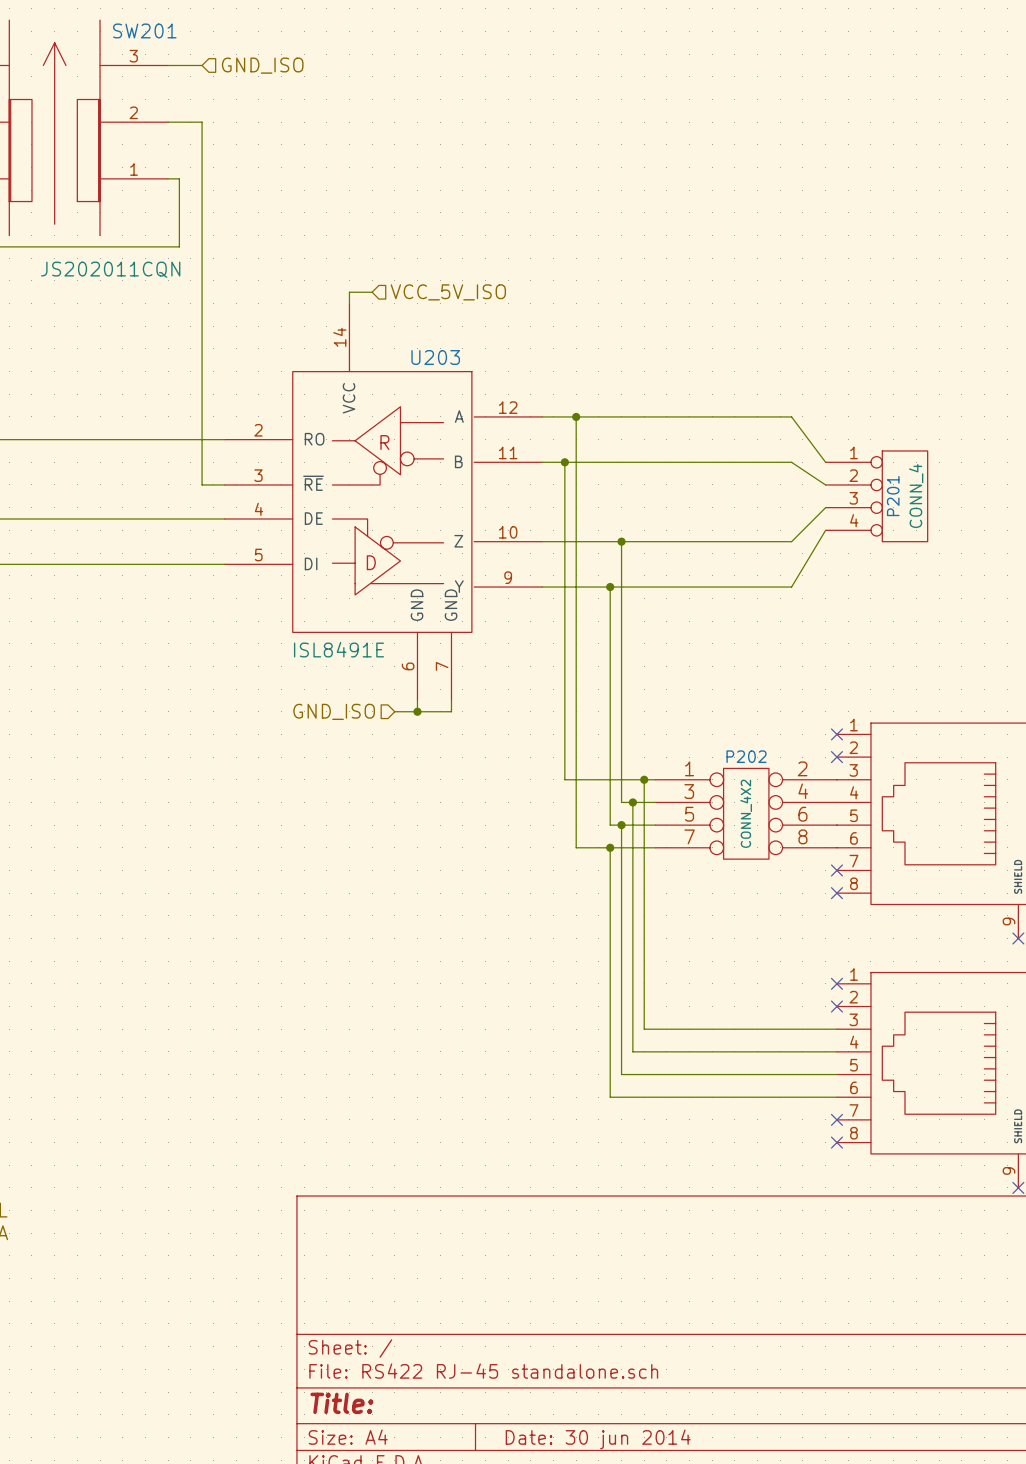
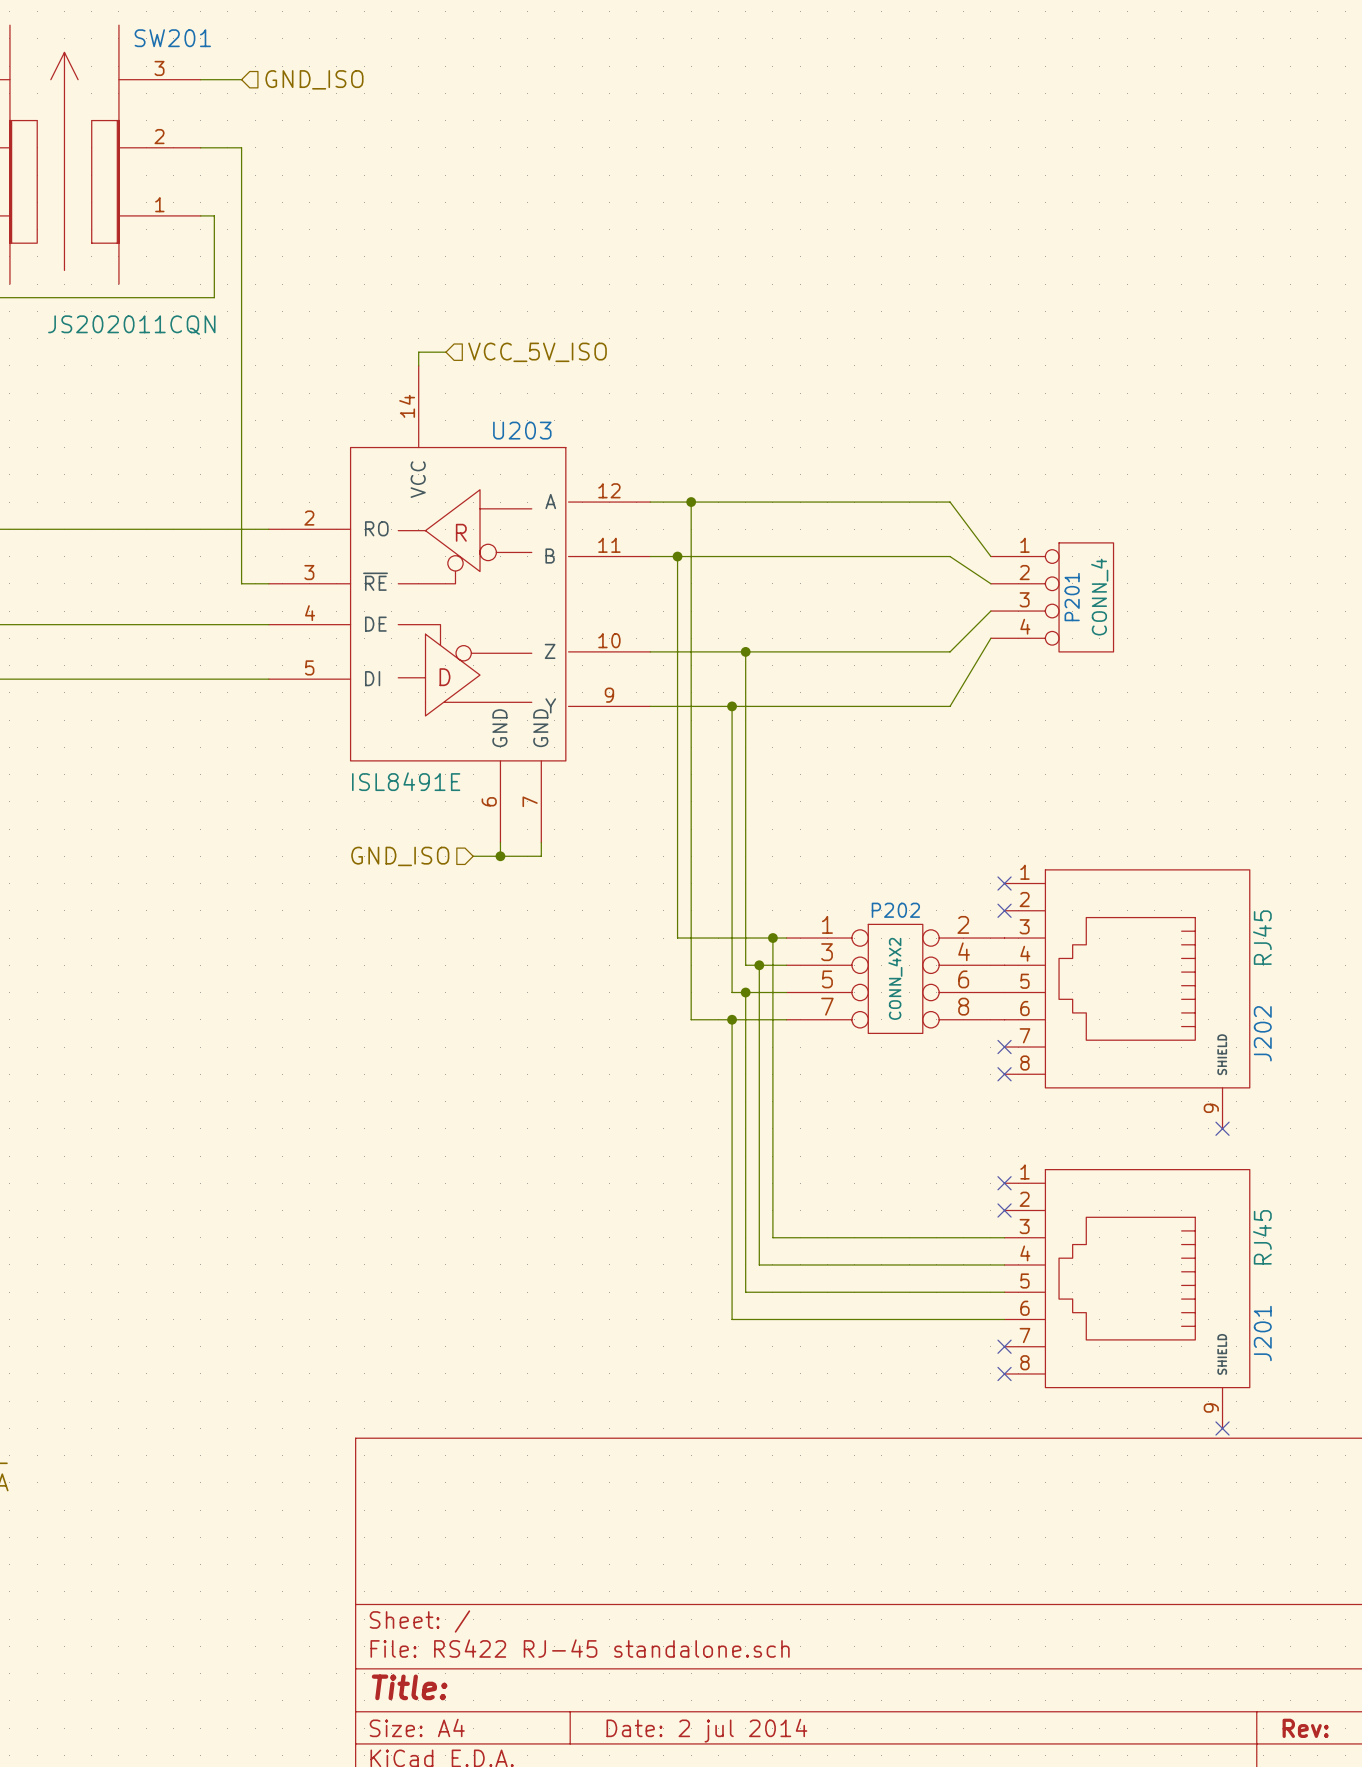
title block: Date: 30 jun 2014 (598, 1439) -> Date: 2 jul 2014 (706, 1730)

